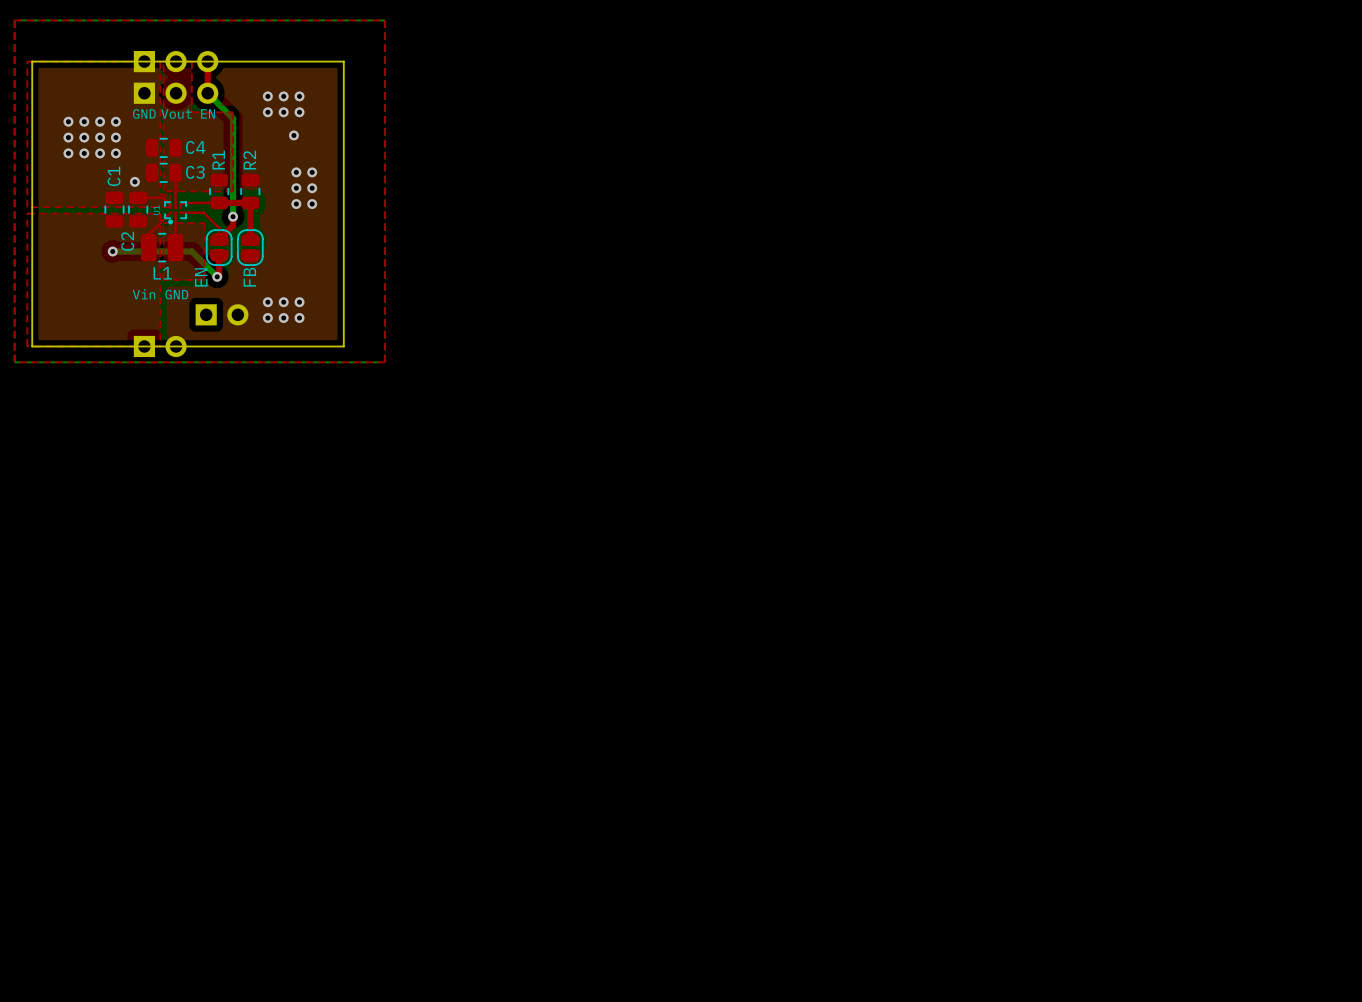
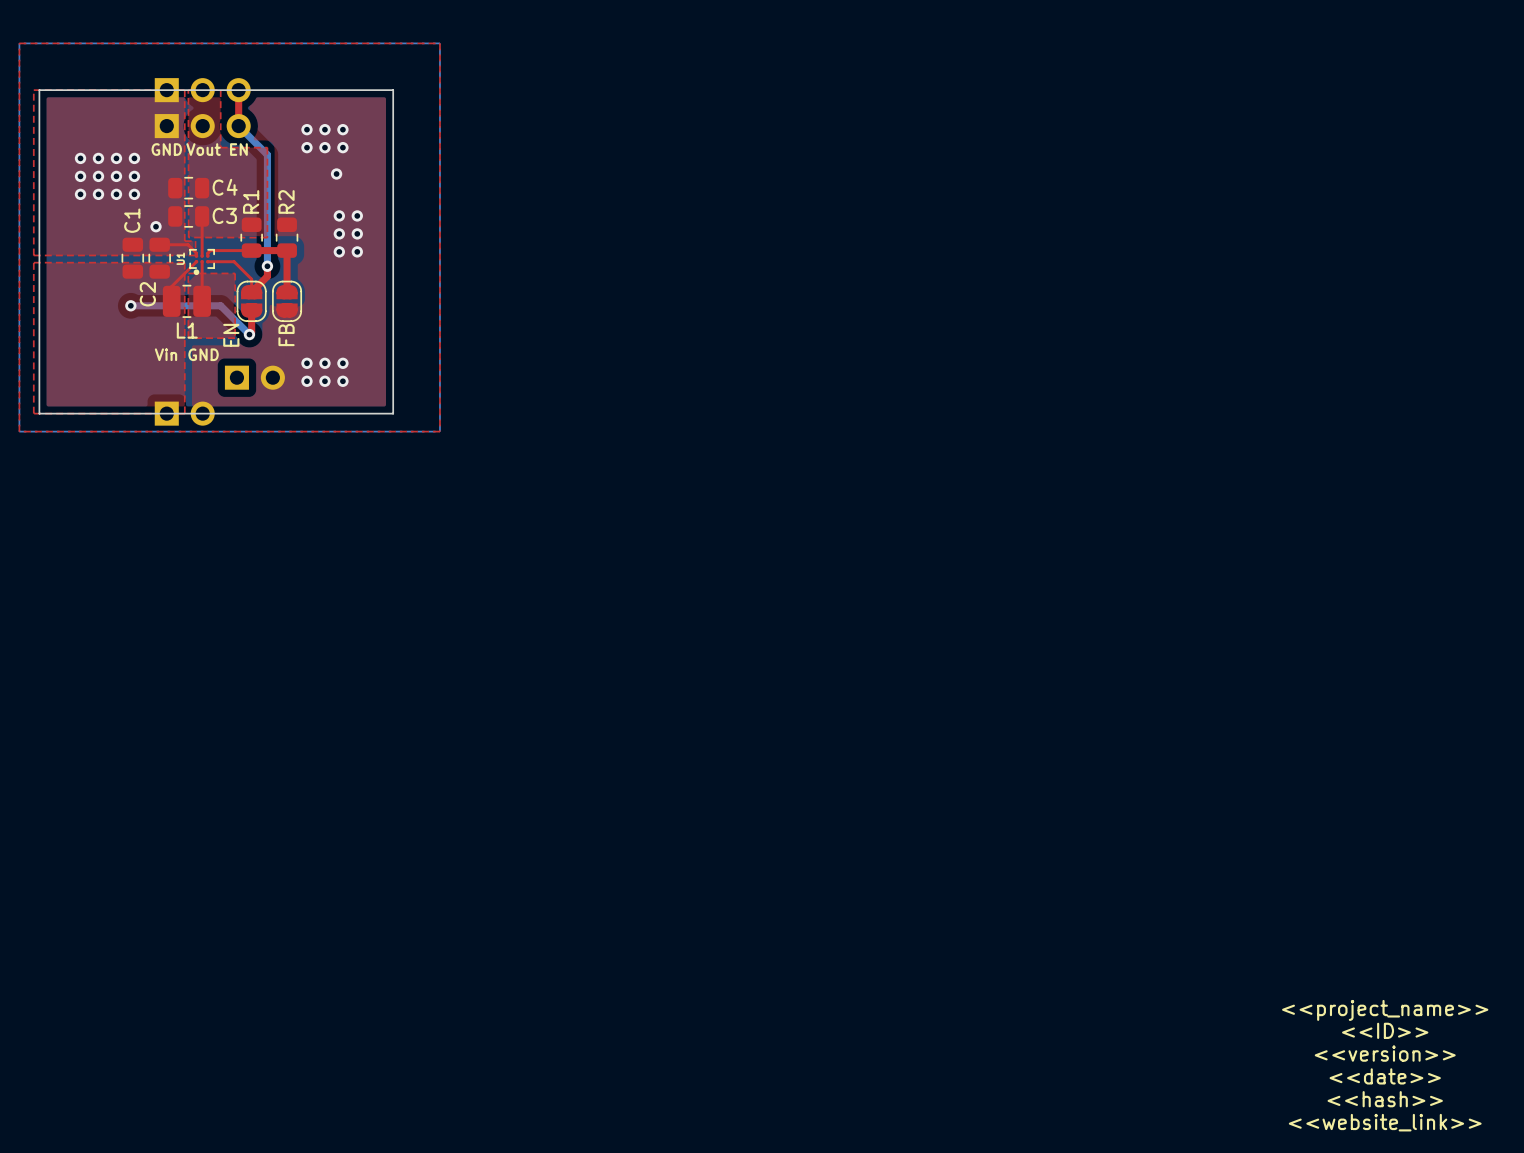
text: none -> <<project_name>> (1385, 1010)
text: none -> <<ID>> (1385, 1030)
text: none -> <<version>> (1385, 1053)
text: none -> <<date>> (1385, 1076)
text: none -> <<hash>> (1385, 1099)
text: none -> <<website_link>> (1385, 1122)

